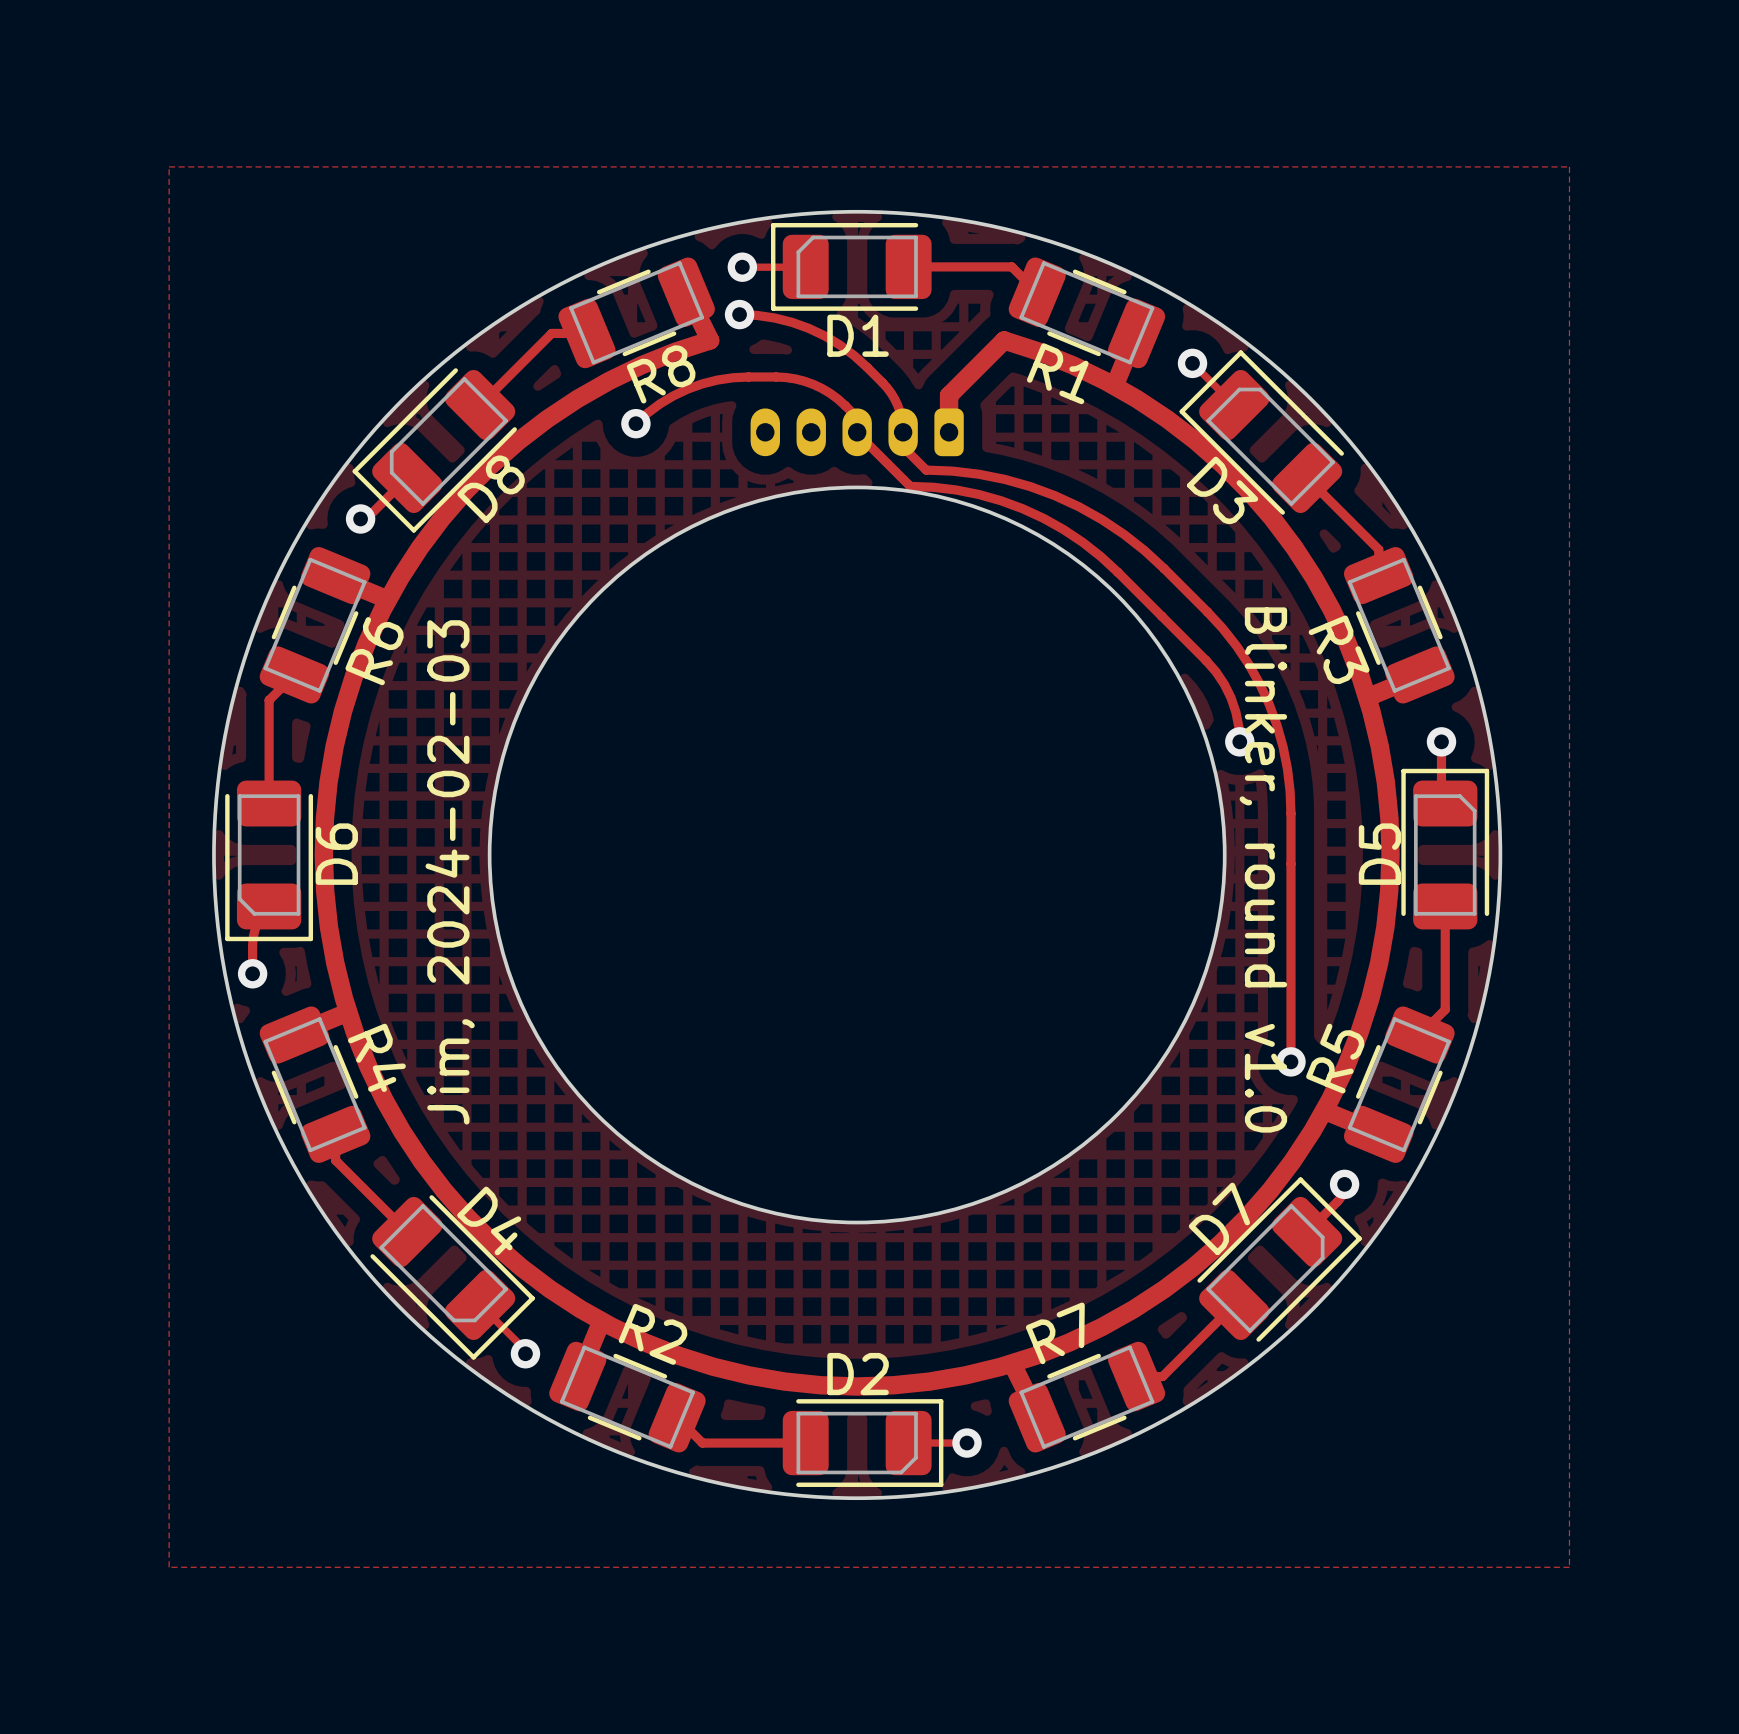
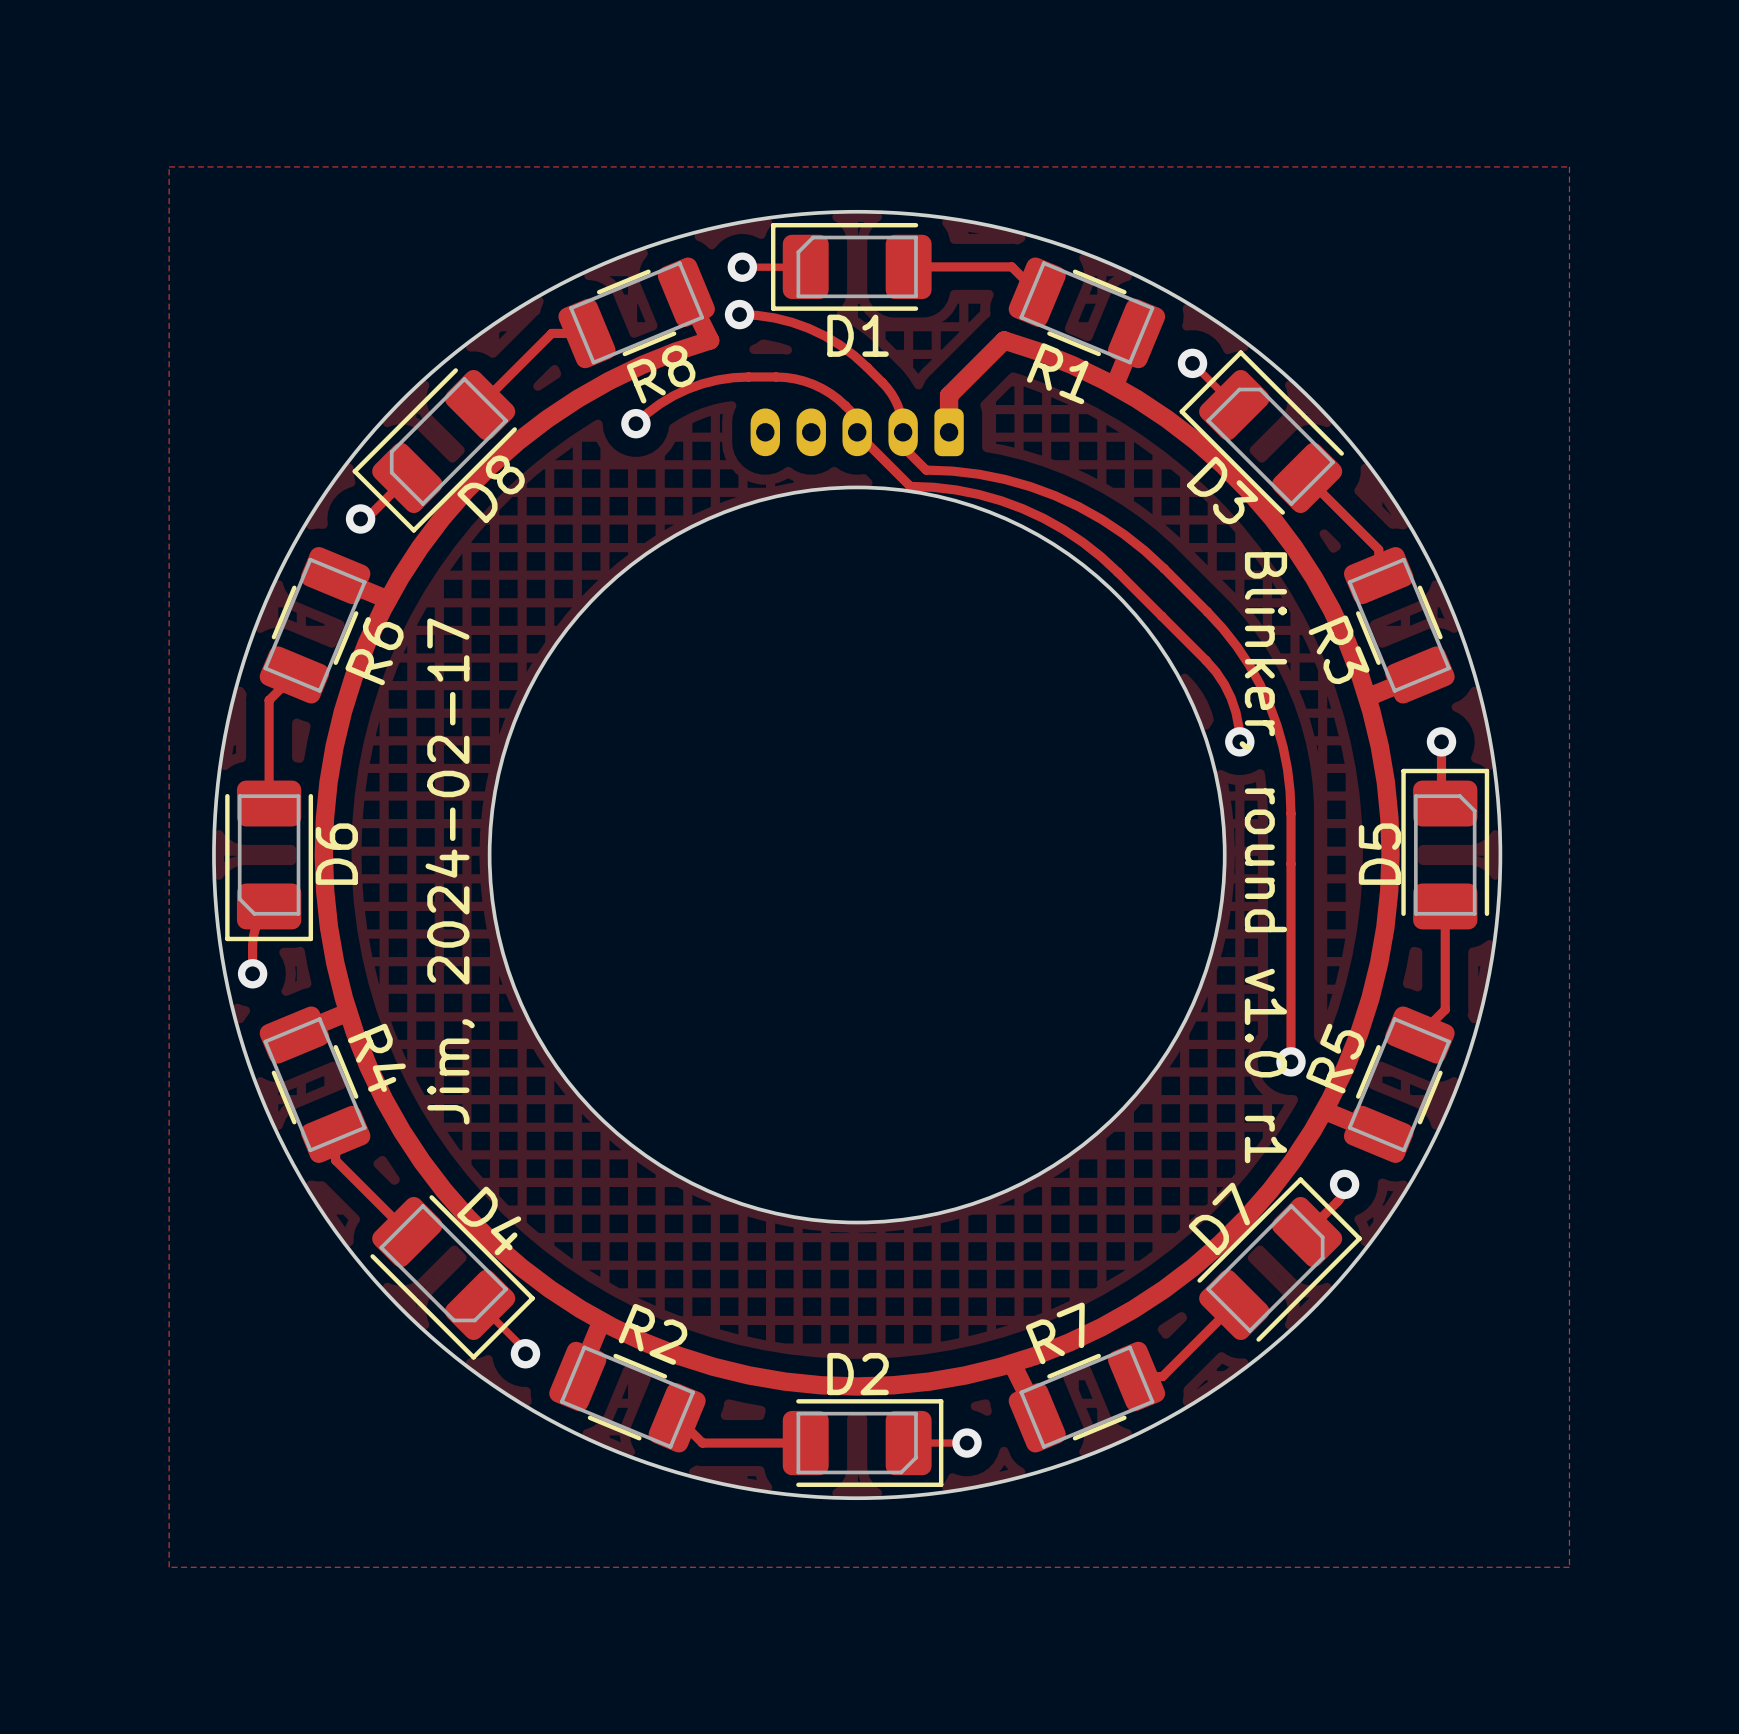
text: Blinker, round v1.0 (1263, 869) -> Blinker, round v1.0 r1 (1263, 857)
text: Jim, 2024-02-03 (450, 872) -> Jim, 2024-02-17 (450, 871)

